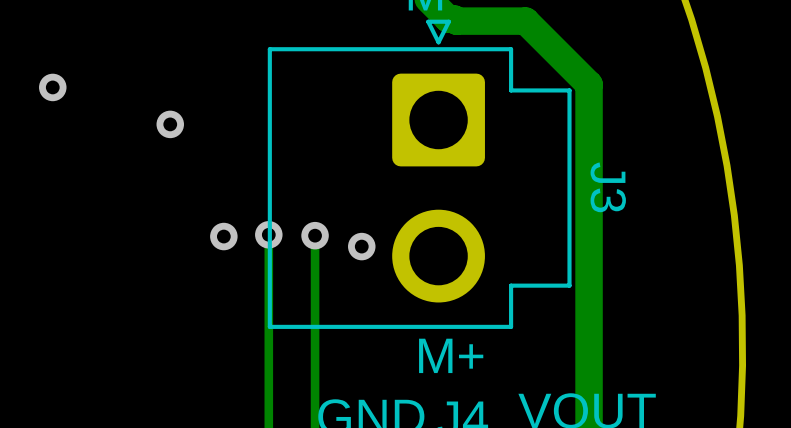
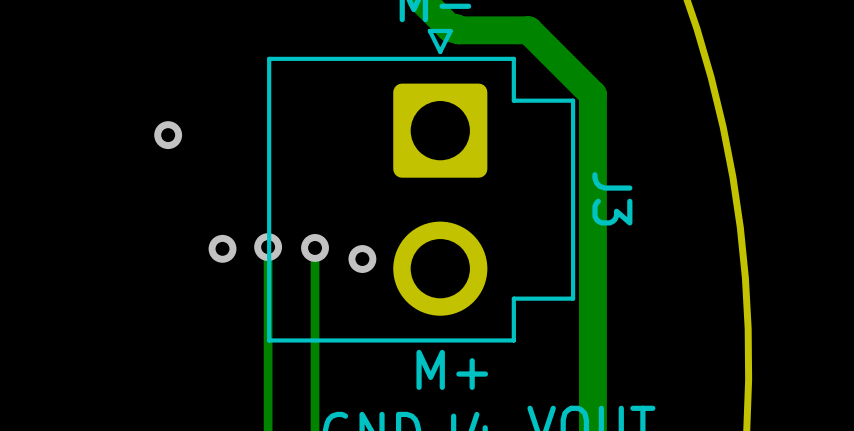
via: (52, 87) -> none

